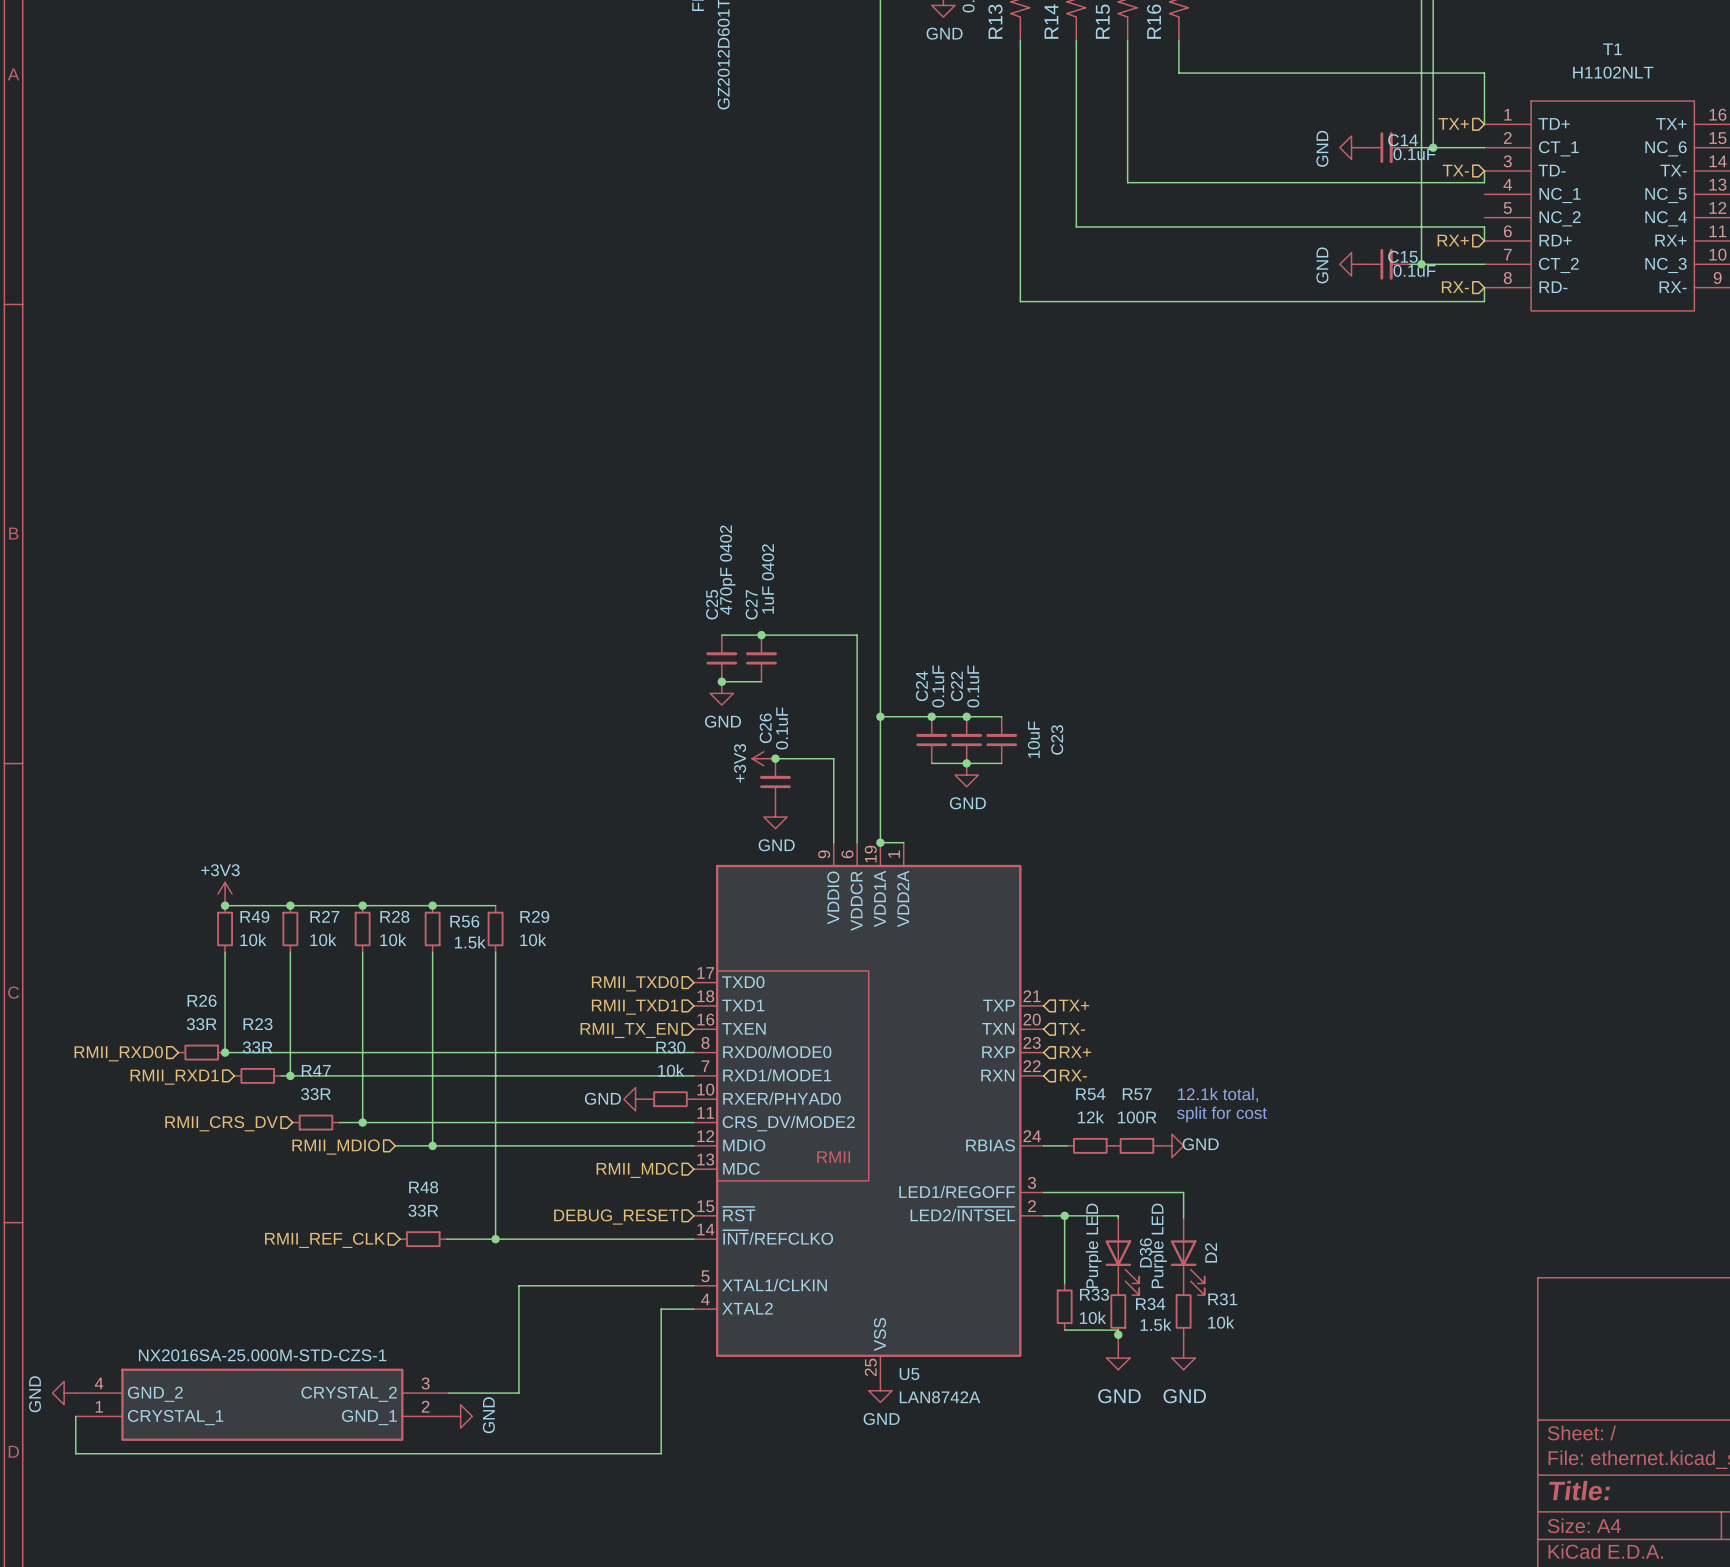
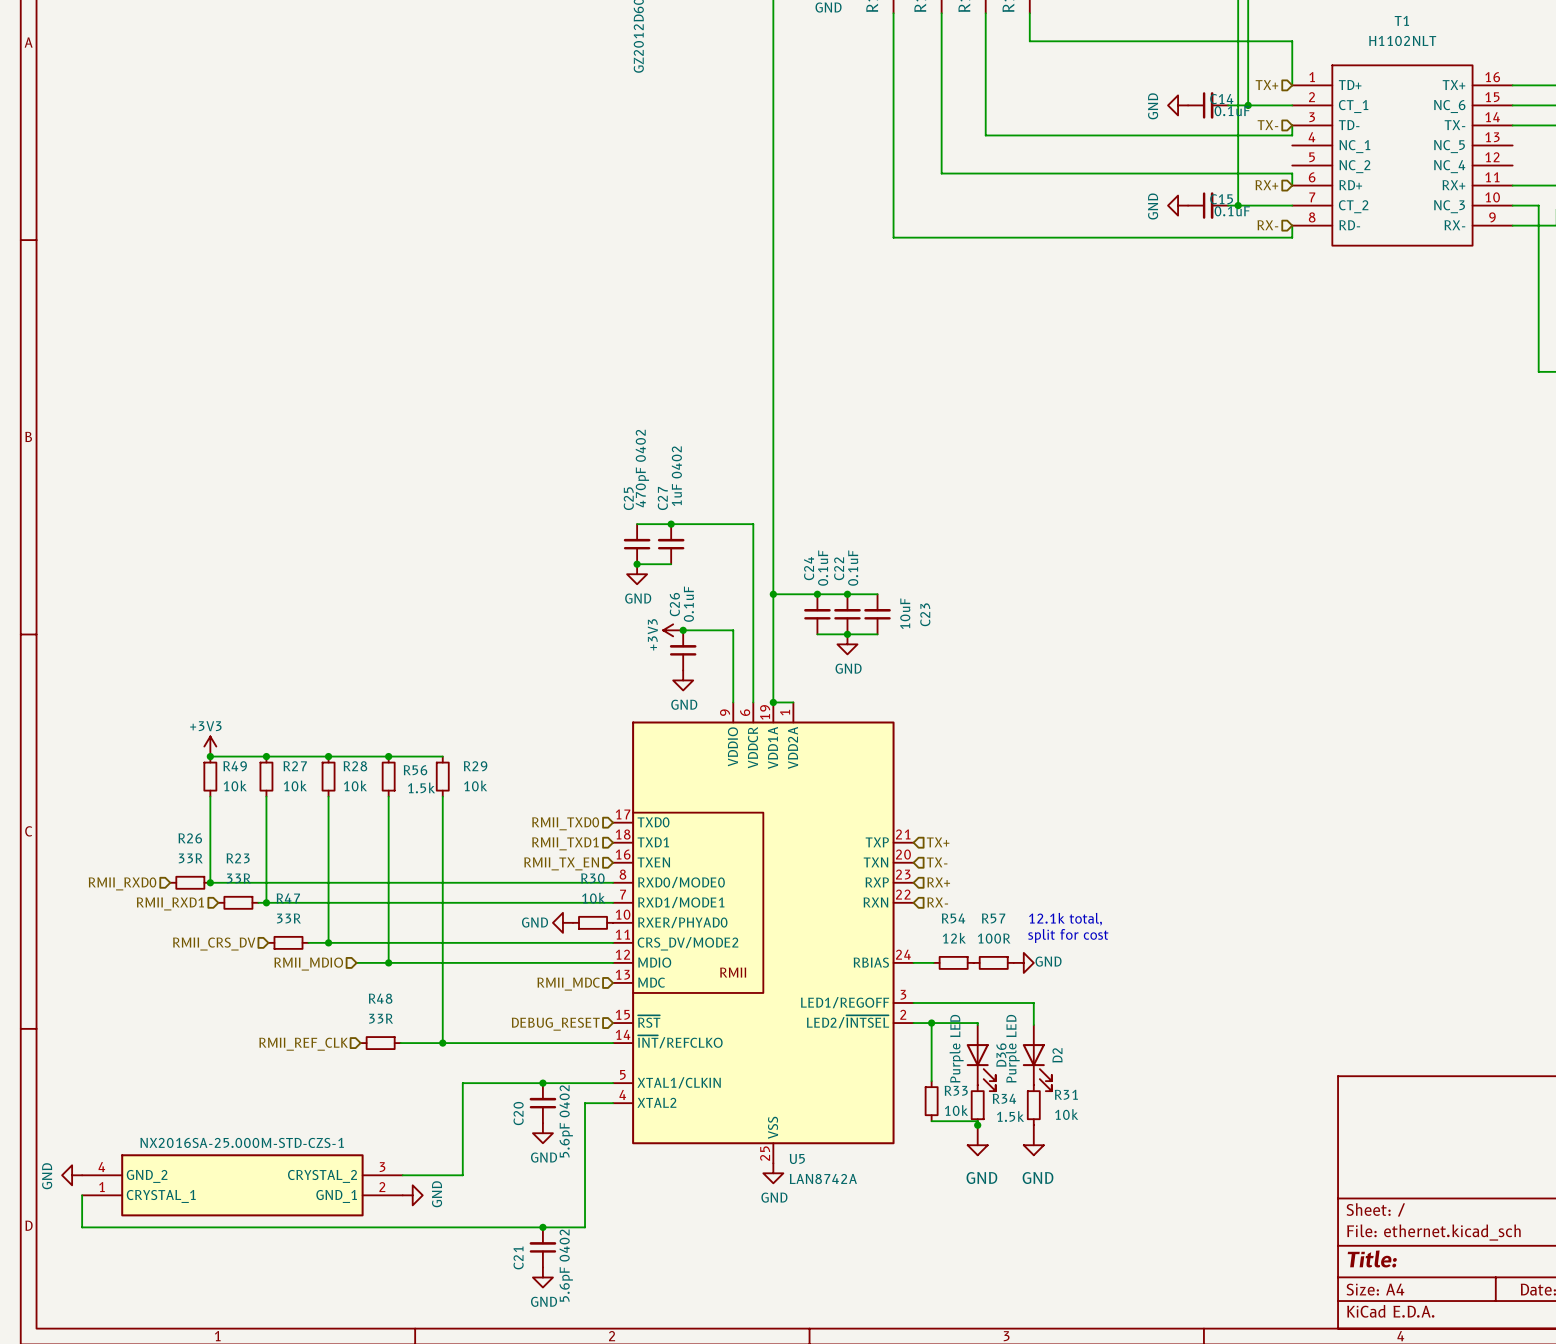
junction: none -> (542, 1083)
C20: none -> 5.6pF 0402 (542, 1103)
power symbol: none -> GND (542, 1133)
junction: none -> (542, 1227)
C21: none -> 5.6pF 0402 (542, 1247)
power symbol: none -> GND (542, 1277)

